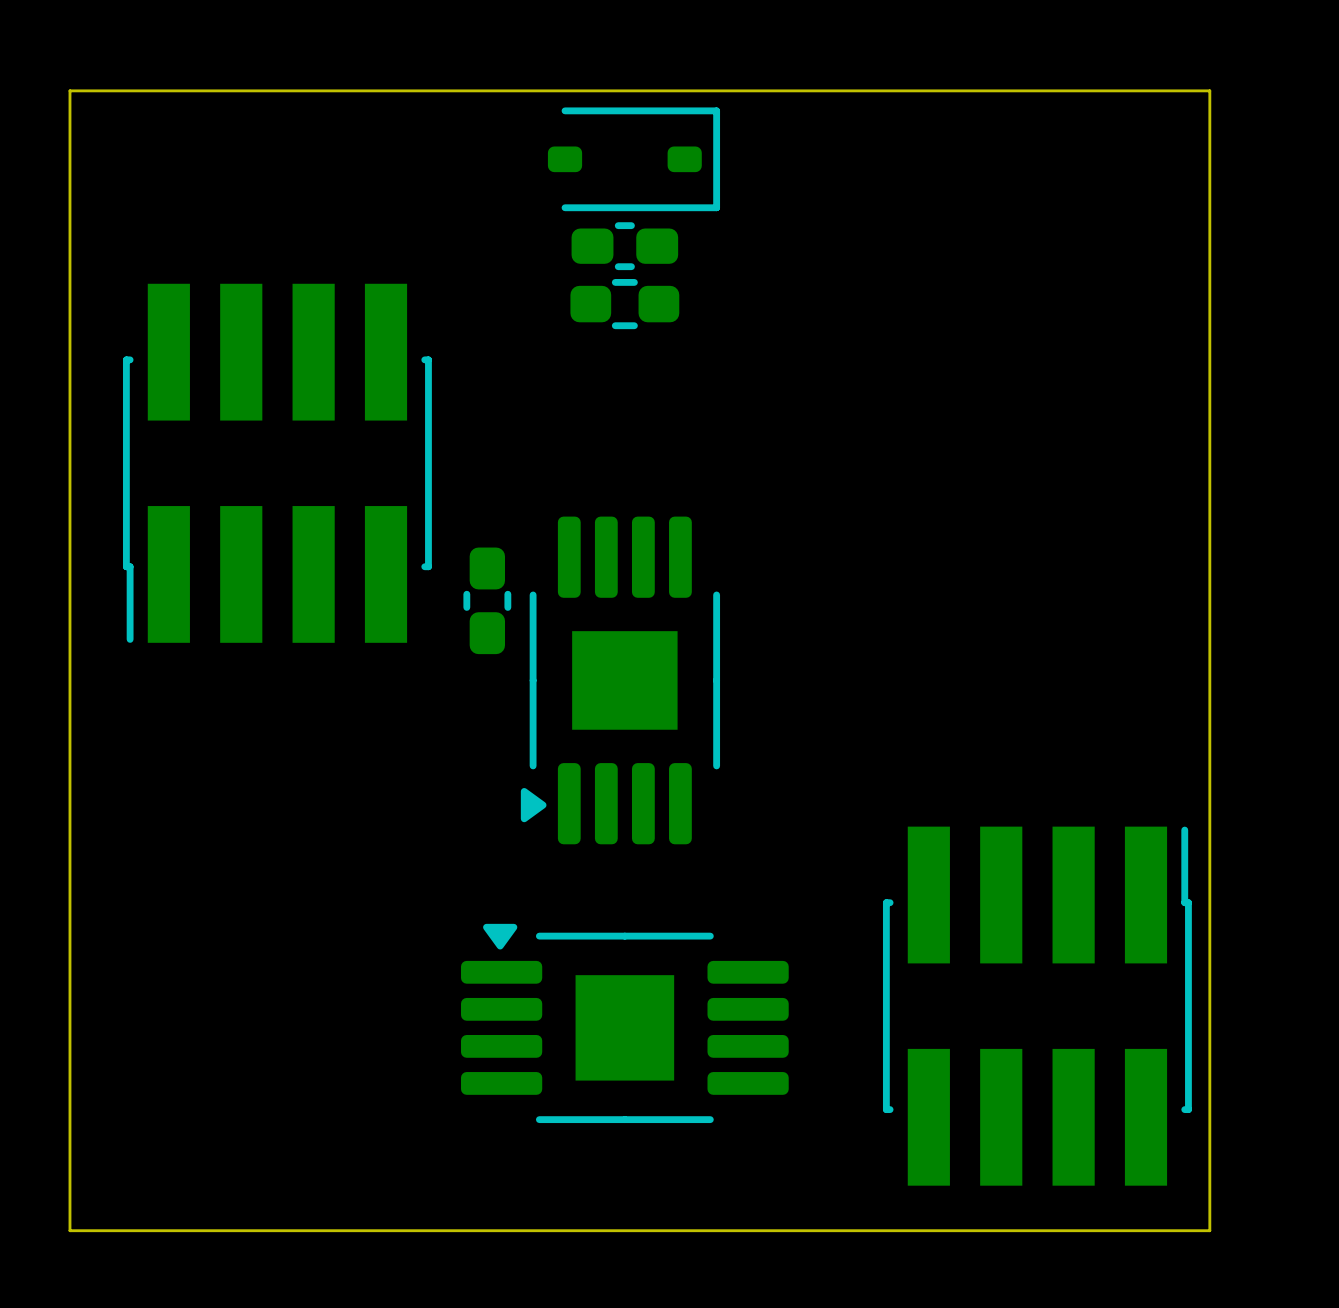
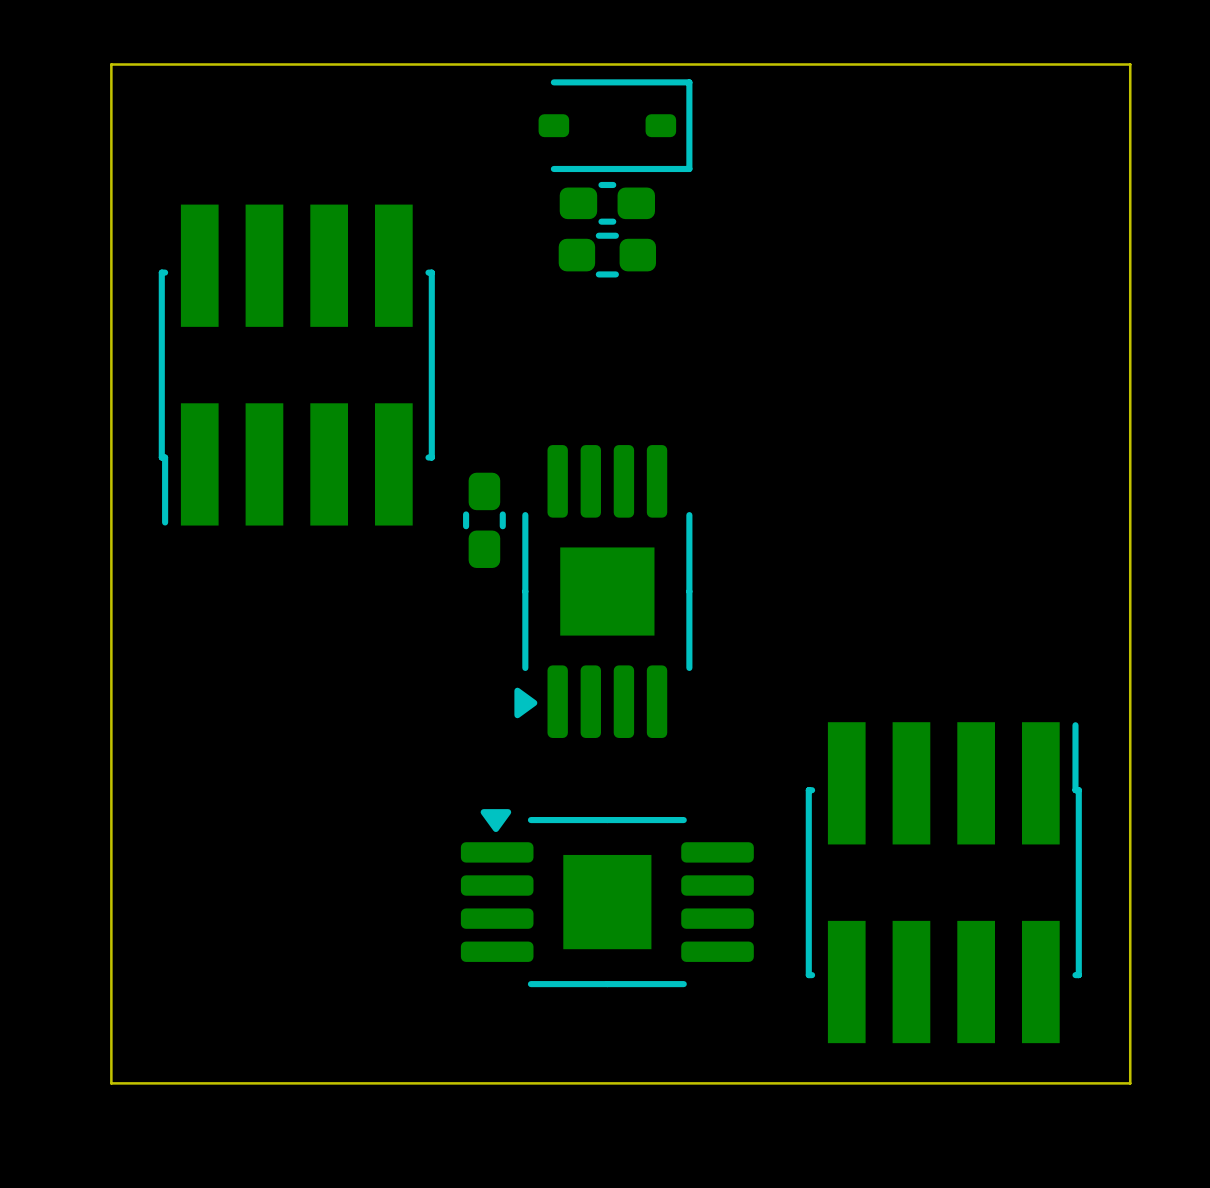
part position: (277, 463) -> (296, 365)
part position: (1037, 1006) -> (943, 882)

